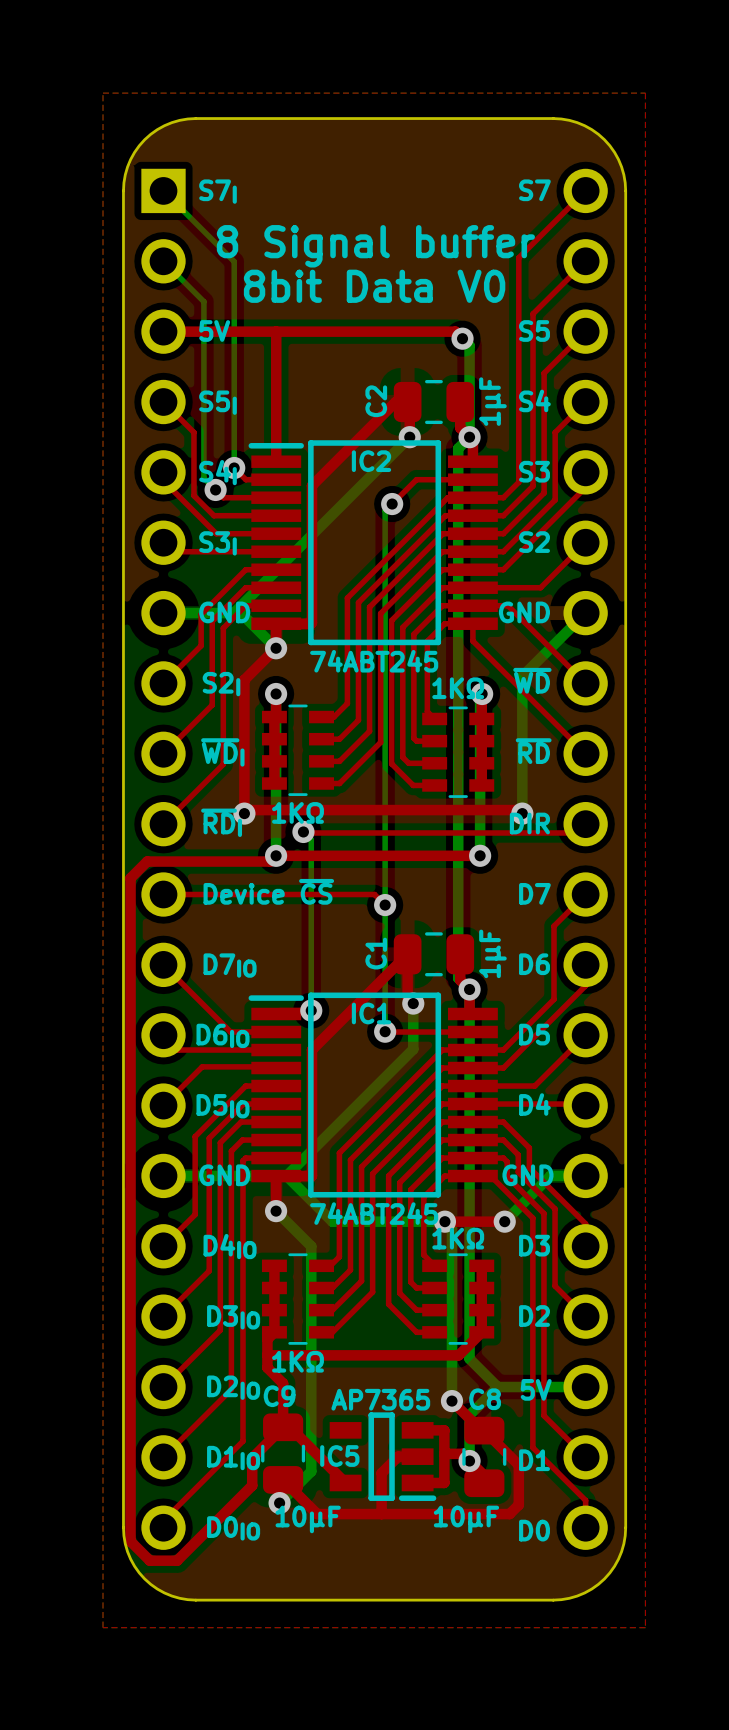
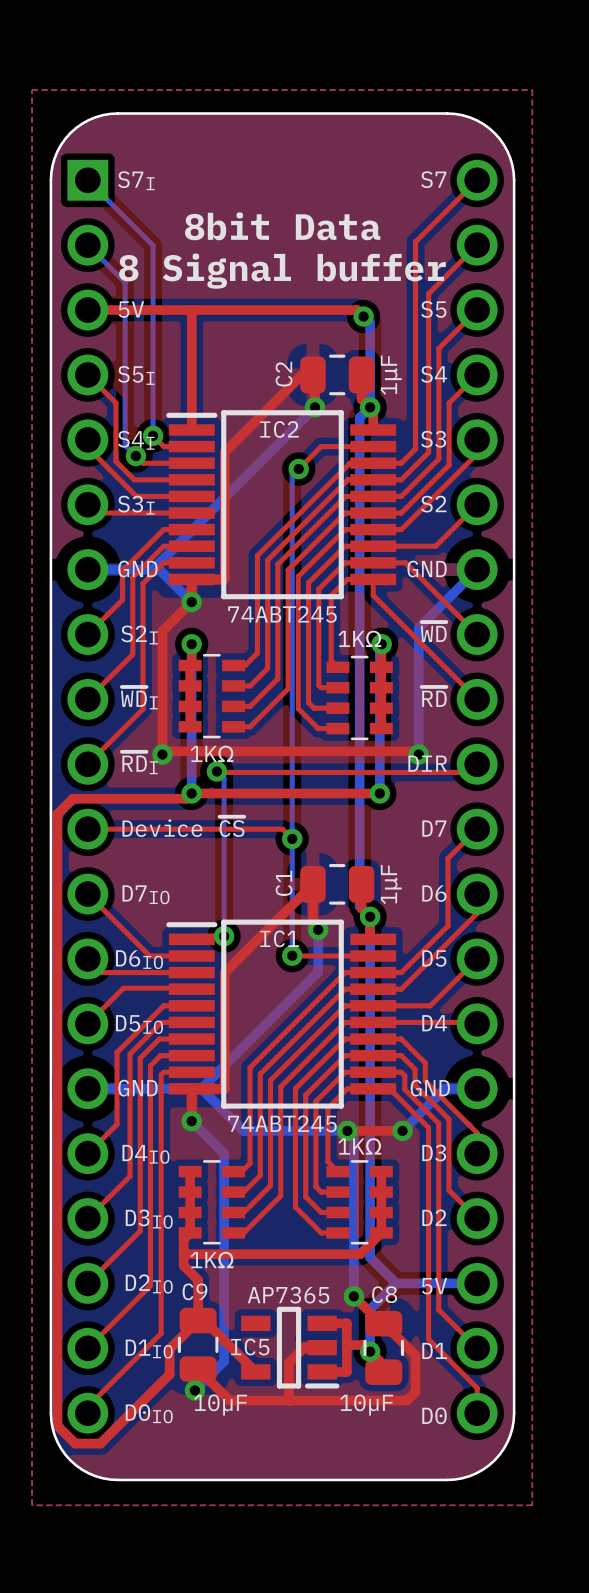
text: 8 Signal buffer (375, 246) -> 8bit Data (282, 226)
text: 8bit Data V0 (374, 286) -> 8 Signal buffer (282, 271)

